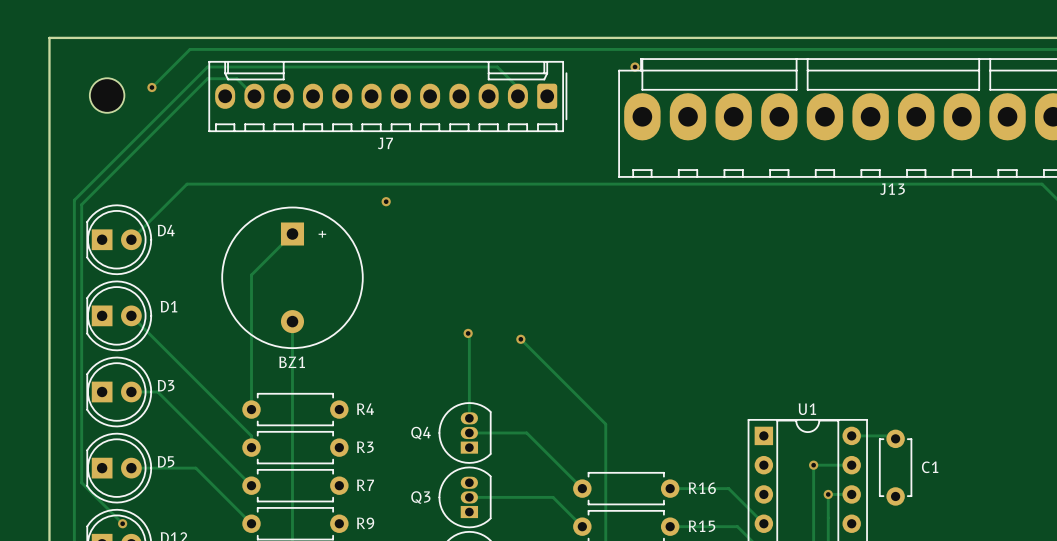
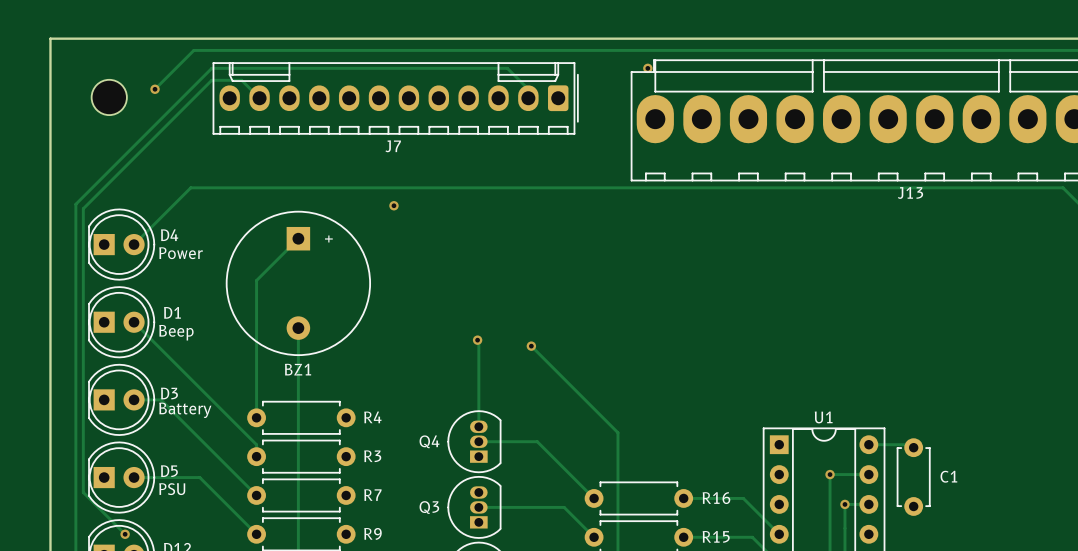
D4 text: none -> Power (181, 253)
D1 text: none -> Beep (176, 332)
D3 text: none -> Battery (185, 410)
D5 text: none -> PSU (172, 489)

